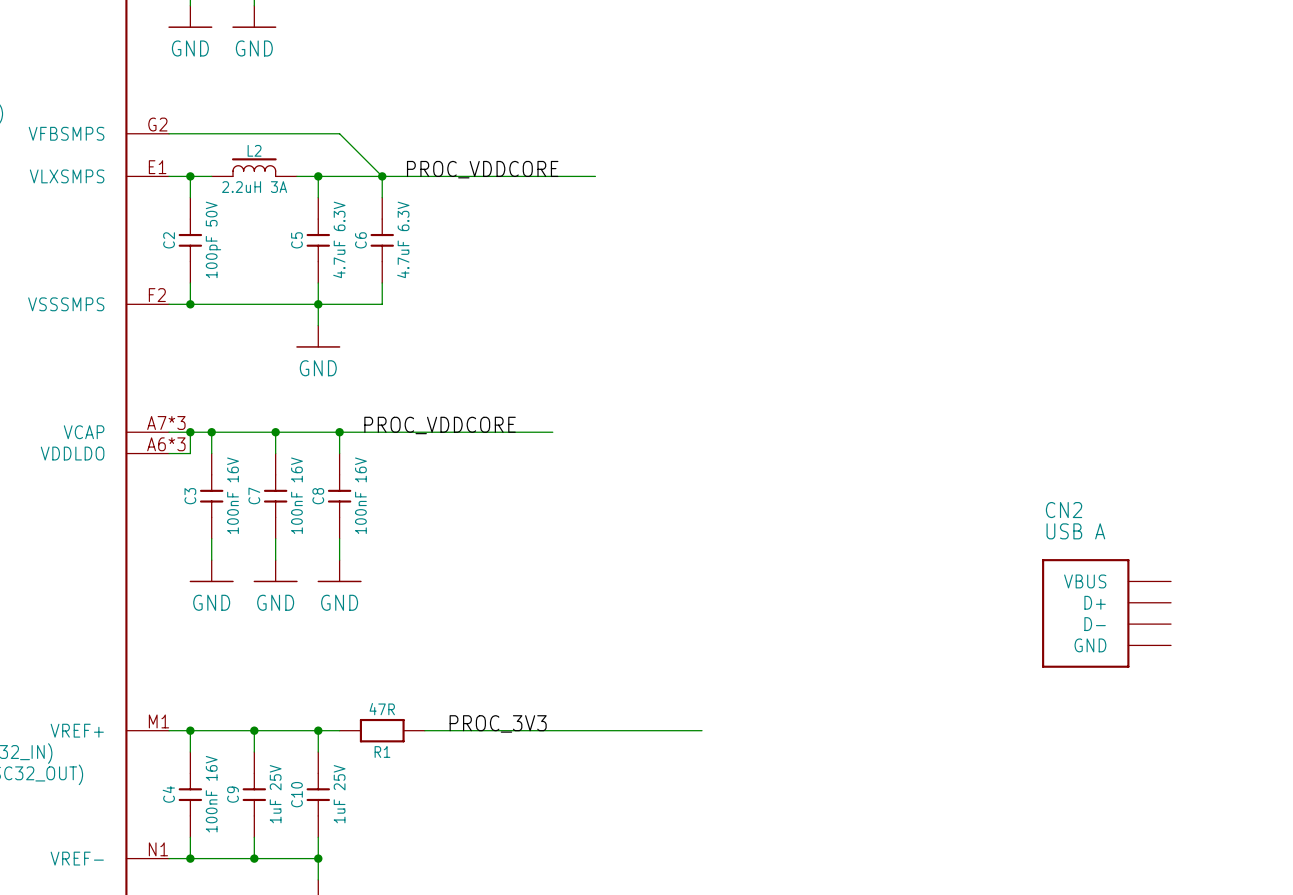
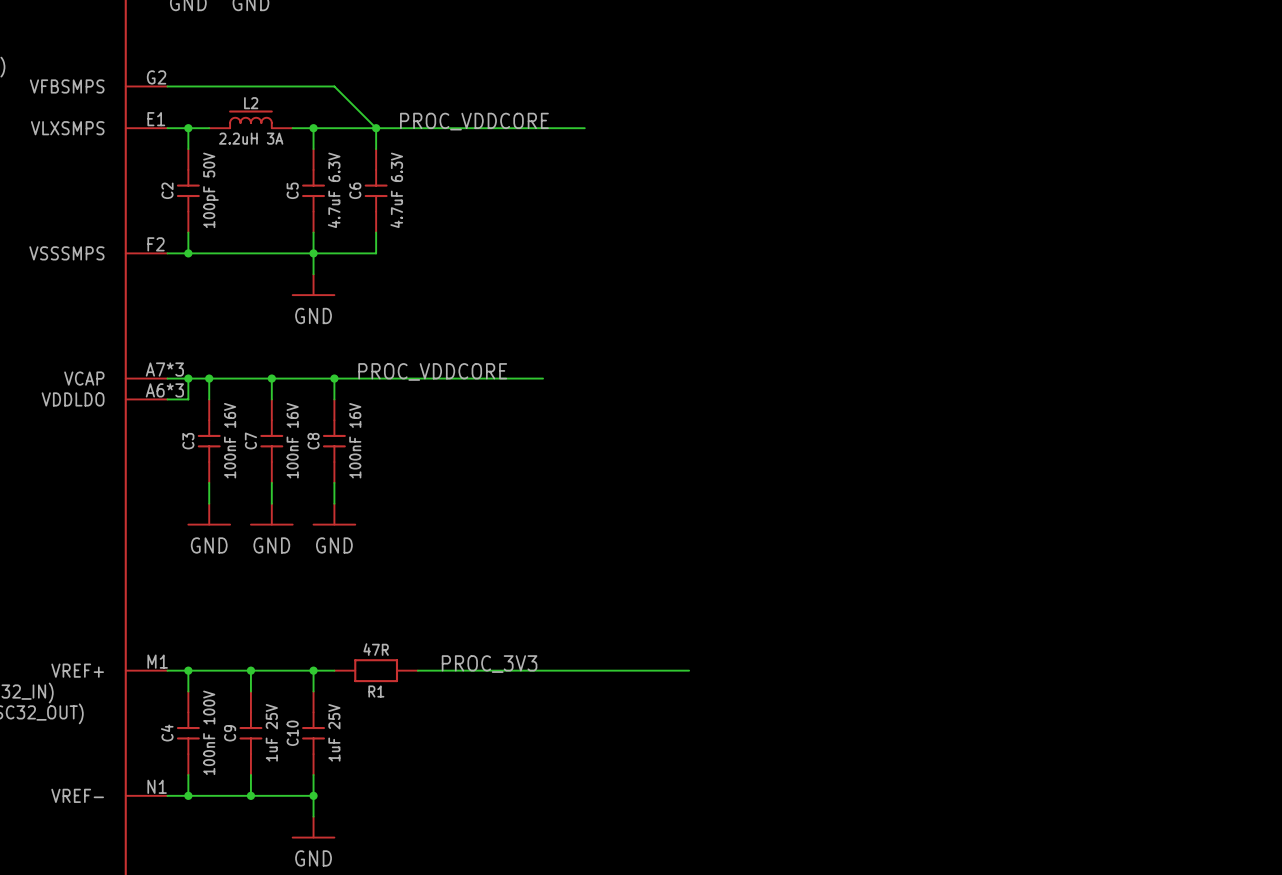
CN2: USB A (1106, 613) -> none
C4 value: 100nF 16V (211, 794) -> 100nF 100V (209, 732)

